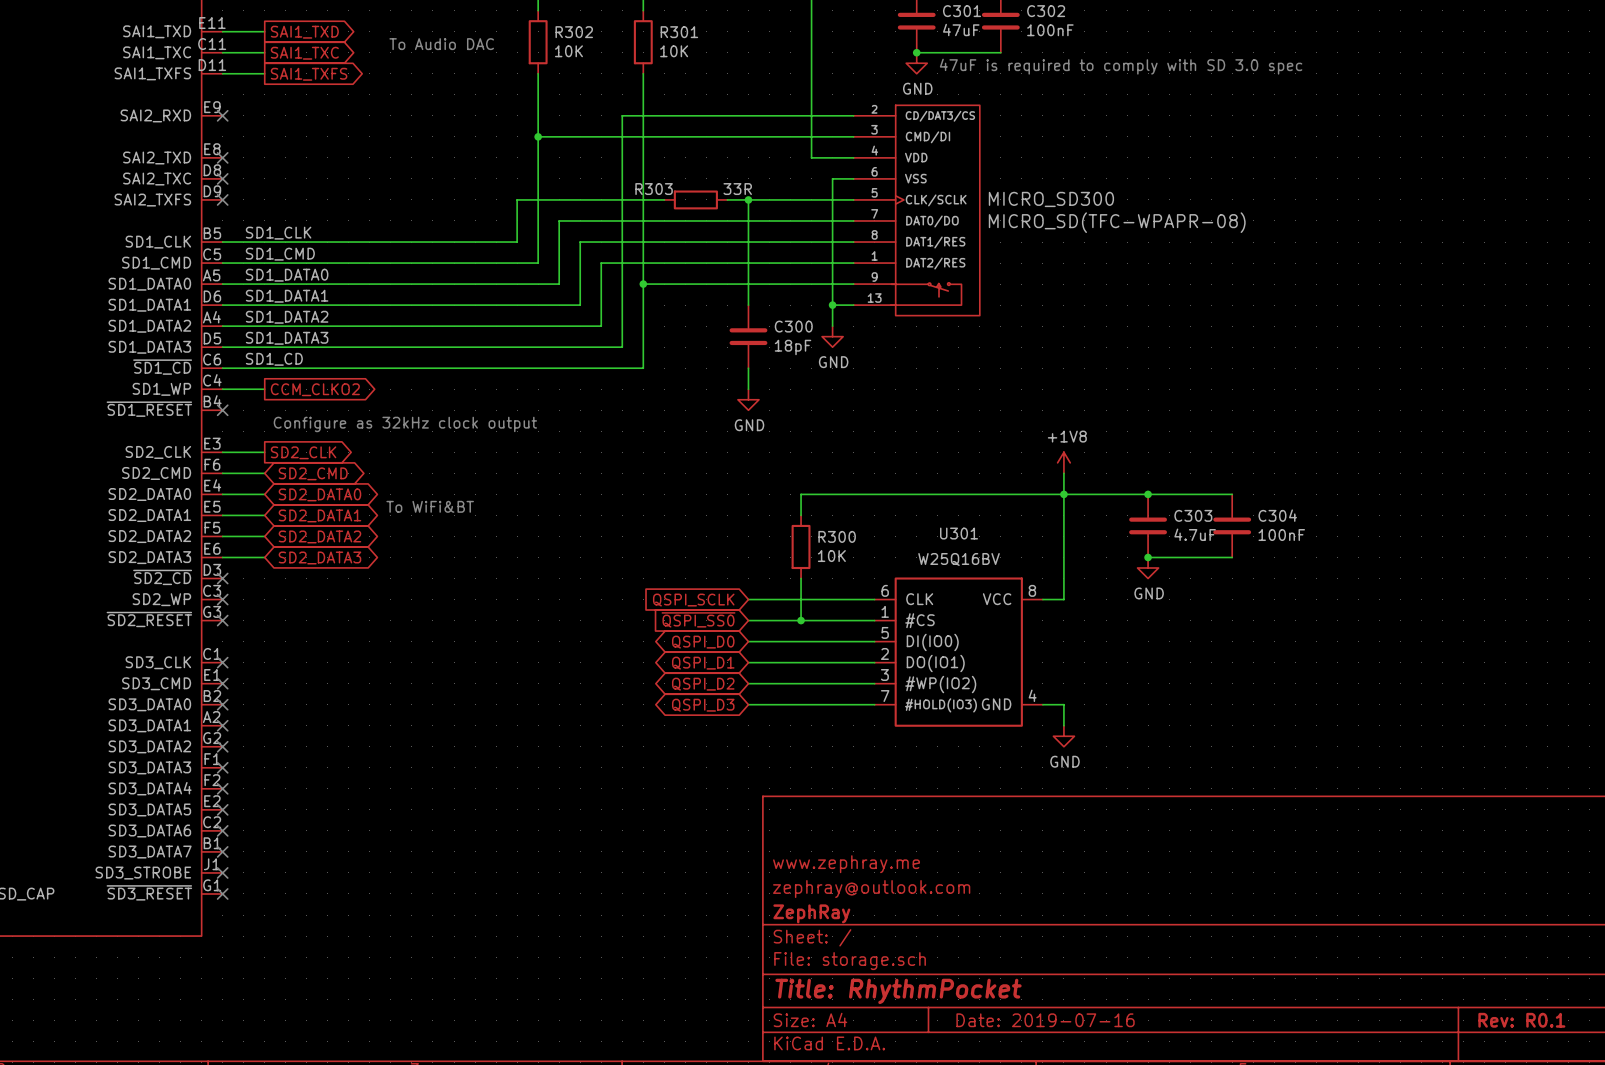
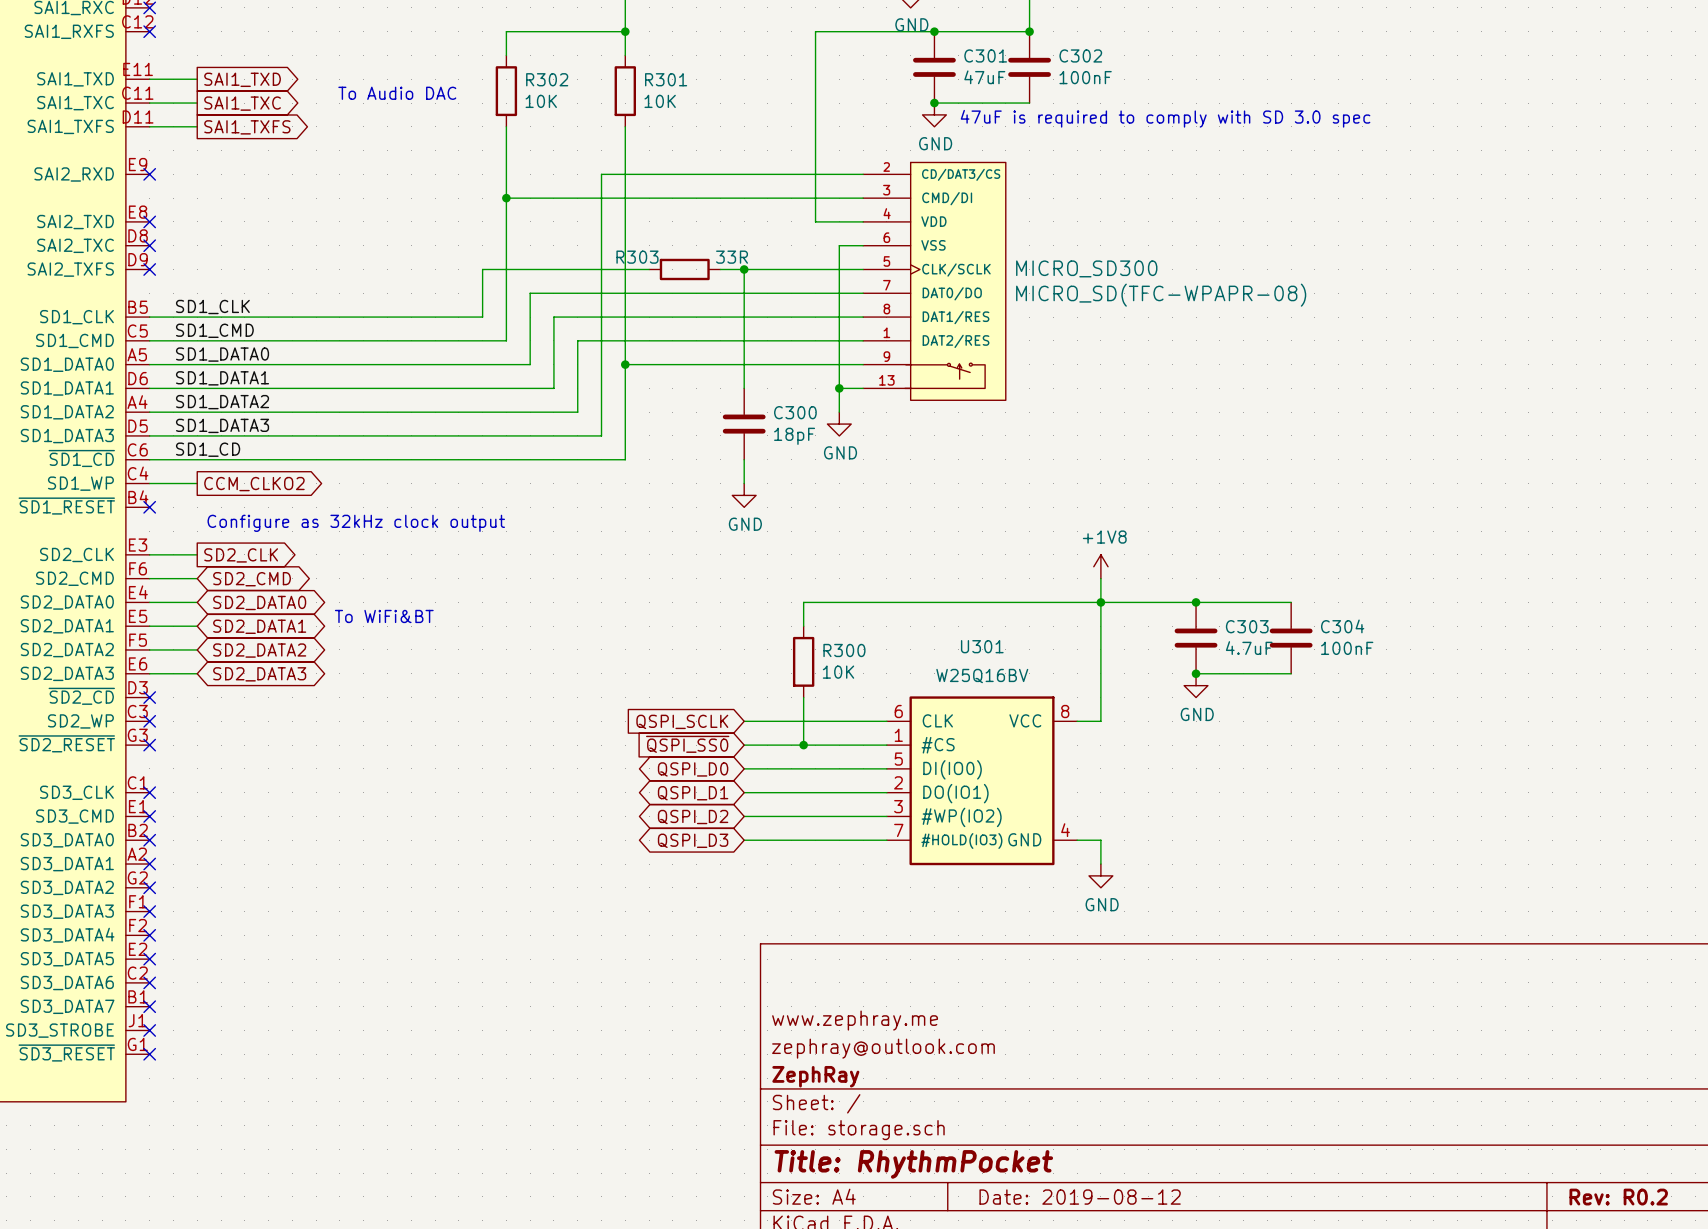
title block: Date: 2019-07-16 (1045, 1020) -> Date: 2019-08-12 (1080, 1197)
title block: Rev: R0.1 (1521, 1020) -> Rev: R0.2 (1618, 1197)

